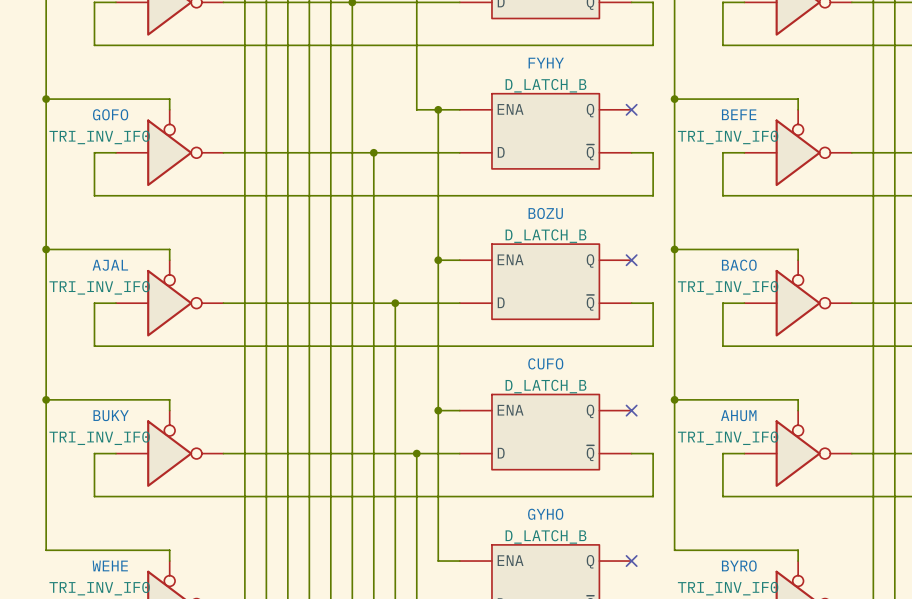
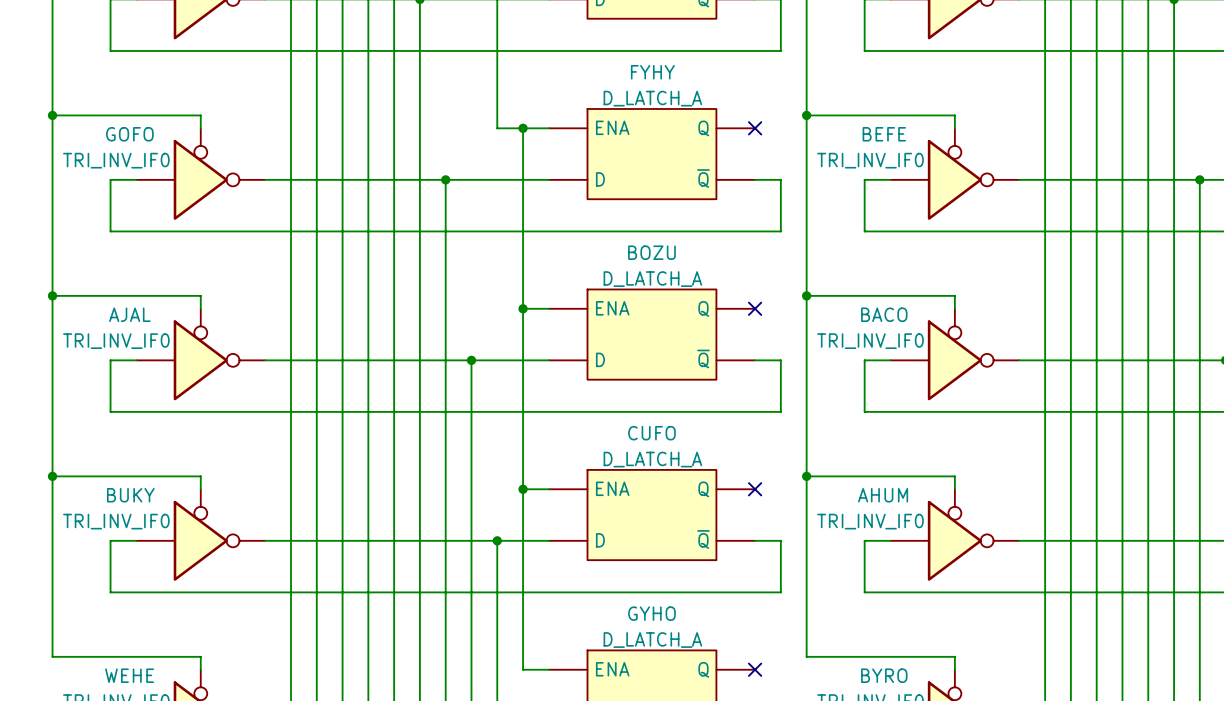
FYHY value: D_LATCH_B (545, 85) -> D_LATCH_A (652, 98)
BOZU value: D_LATCH_B (545, 236) -> D_LATCH_A (652, 279)
CUFO value: D_LATCH_B (545, 386) -> D_LATCH_A (652, 459)
GYHO value: D_LATCH_B (545, 536) -> D_LATCH_A (652, 640)

